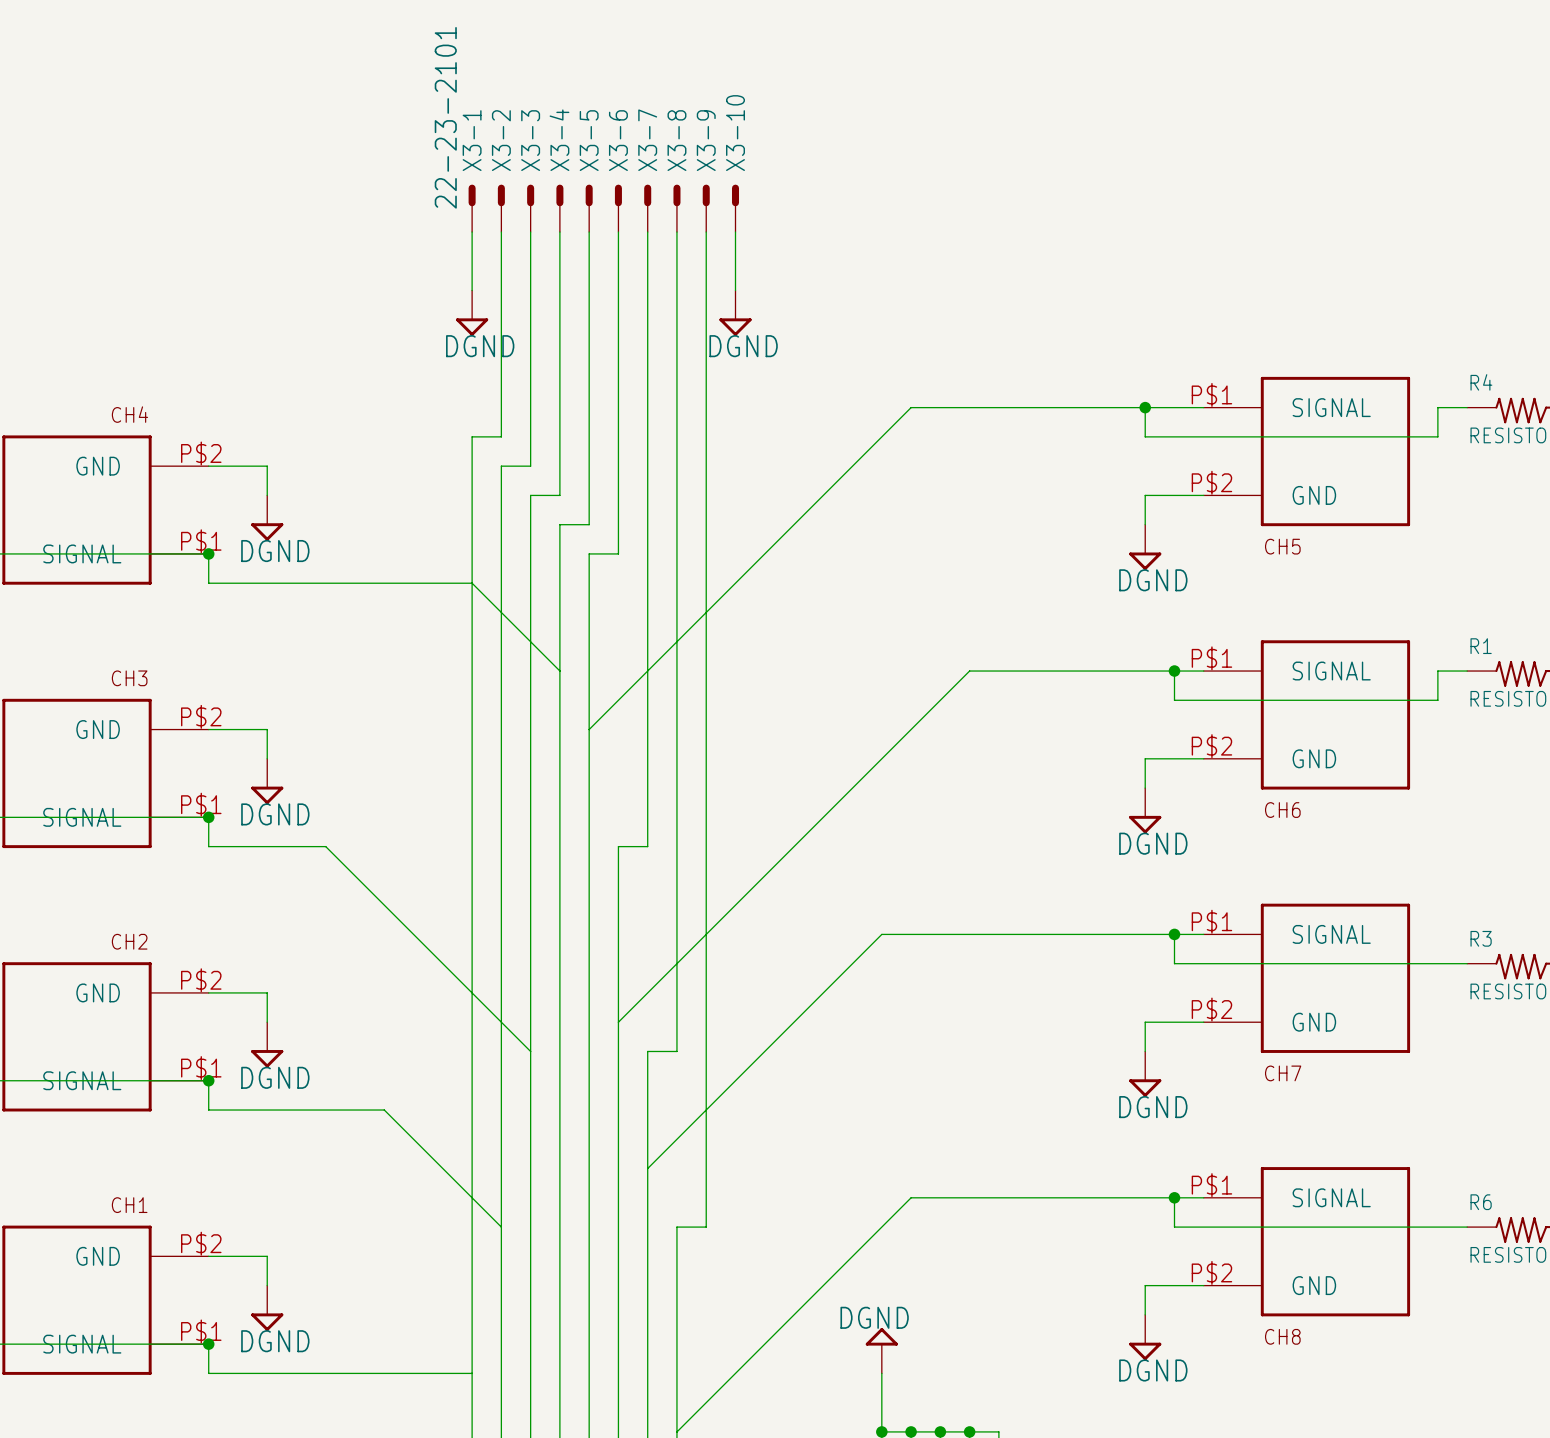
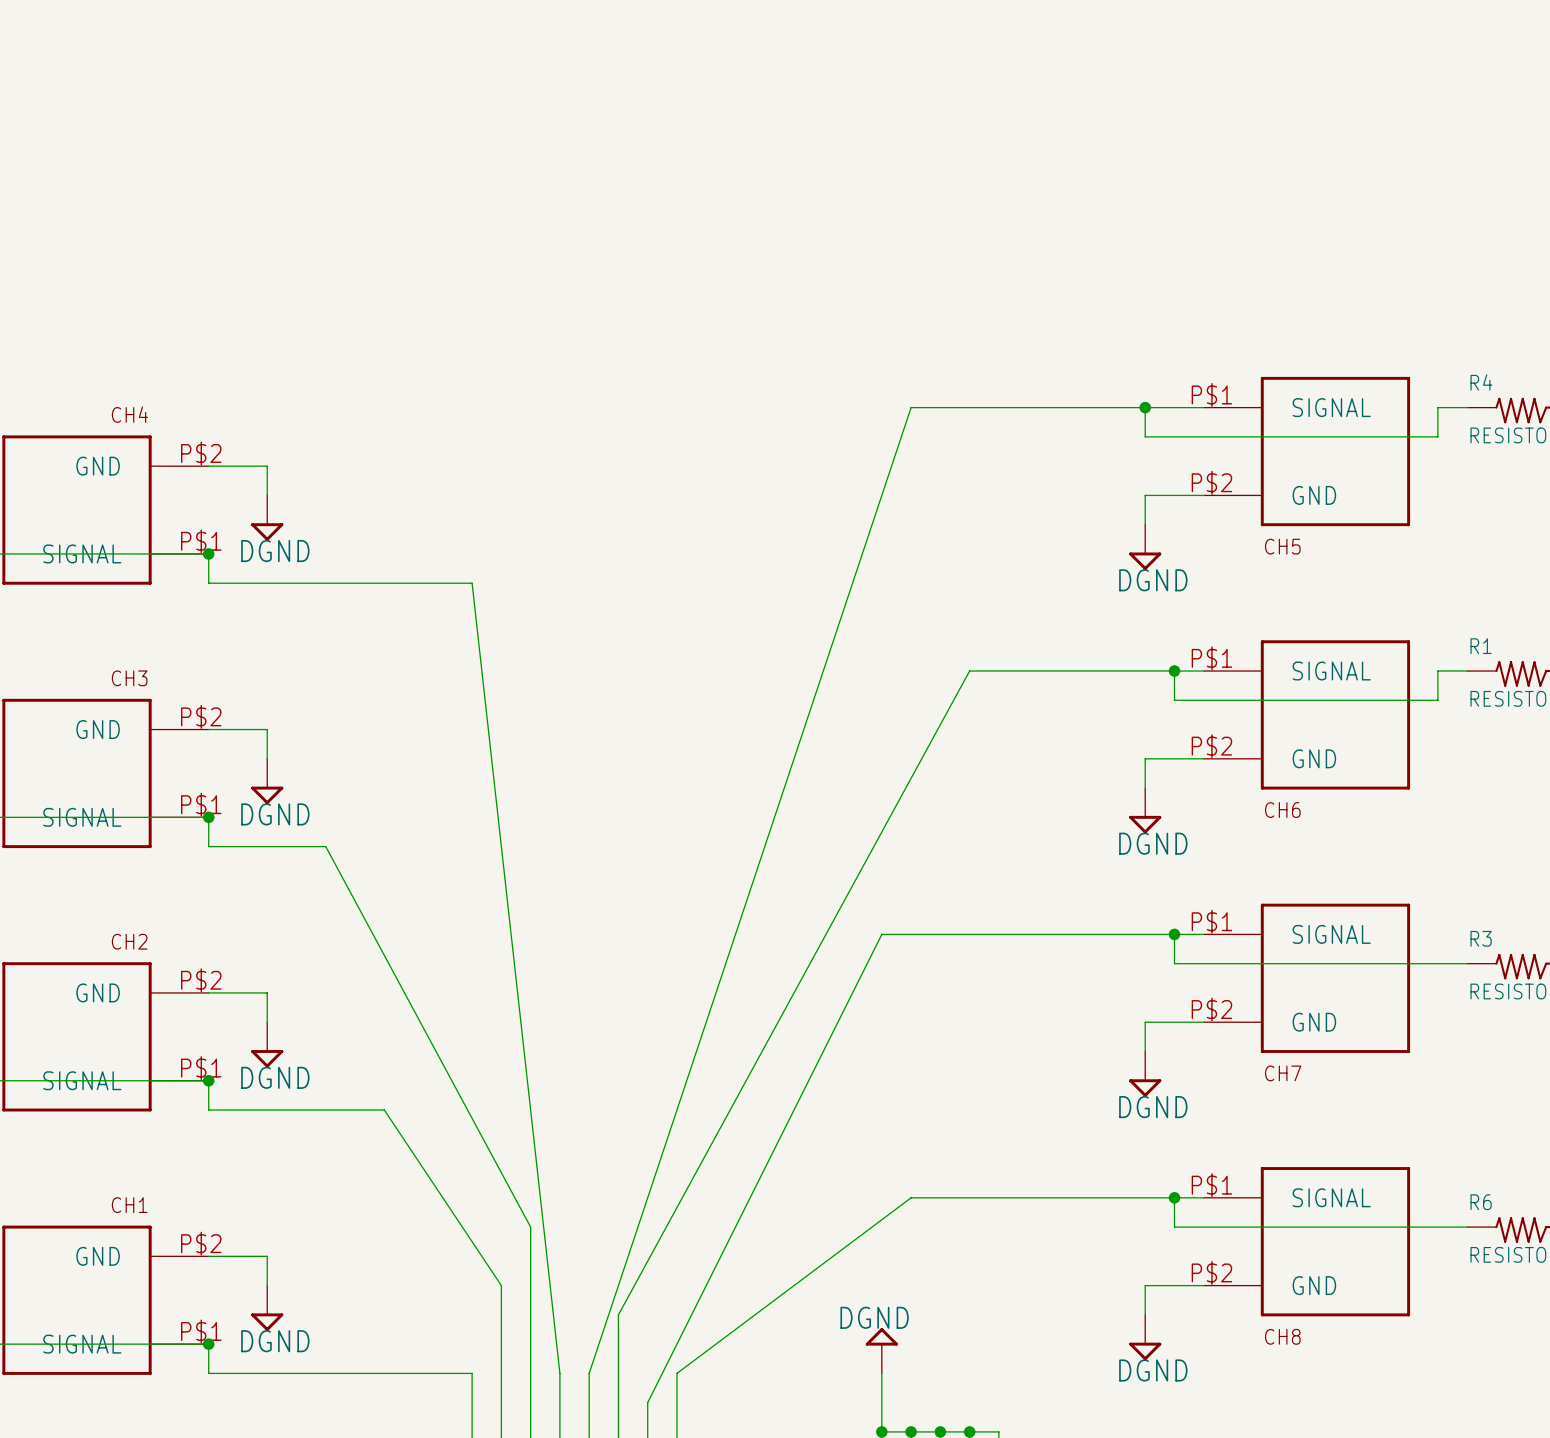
X3-1: 22-23-2101 (472, 208) -> none
X3-2: (501, 208) -> none
X3-3: (530, 208) -> none
X3-4: (559, 208) -> none
X3-5: (589, 208) -> none
X3-6: (618, 208) -> none
X3-7: (647, 208) -> none
X3-8: (676, 208) -> none
X3-9: (706, 208) -> none
X3-10: (735, 208) -> none
wire: (472, 232) (472, 290) -> none
wire: (501, 232) (501, 436) (472, 436) (472, 1373) -> none
wire: (530, 232) (530, 466) (501, 466) (501, 1285) -> none
wire: (559, 232) (559, 495) (530, 495) (530, 1227) -> none
wire: (589, 232) (589, 524) (559, 524) (559, 1373) -> (472, 583) (559, 1373)
wire: (618, 232) (618, 553) (589, 553) (589, 1373) -> (911, 407) (589, 1373)
wire: (647, 232) (647, 846) (618, 846) (618, 1314) -> none
wire: (676, 232) (676, 1051) (647, 1051) (647, 1402) -> none
wire: (706, 232) (706, 1227) (676, 1227) (676, 1373) -> none
wire: (735, 232) (735, 290) -> none
power symbol: DGND (472, 313) -> none
power symbol: DGND (735, 313) -> none
wire: (911, 407) (589, 729) -> none
wire: (472, 583) (559, 671) -> none
wire: (969, 671) (618, 1022) -> (969, 671) (618, 1314)
wire: (325, 846) (530, 1051) -> (325, 846) (530, 1227)
wire: (881, 934) (647, 1168) -> (881, 934) (647, 1402)
wire: (384, 1110) (501, 1227) -> (384, 1110) (501, 1285)
wire: (911, 1197) (676, 1431) -> (911, 1197) (676, 1373)

